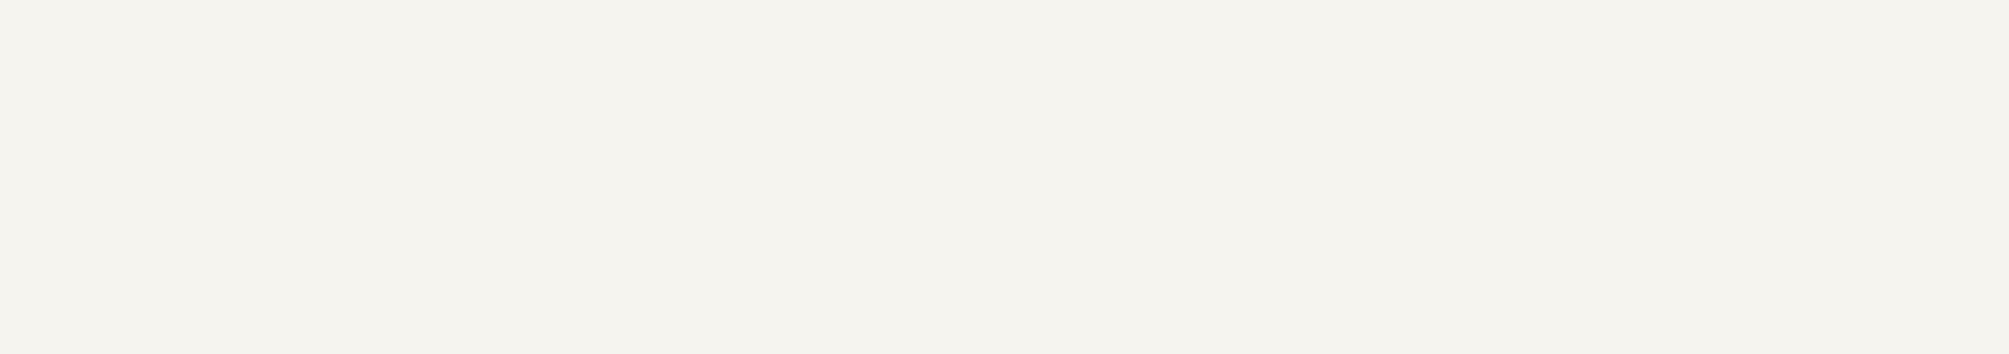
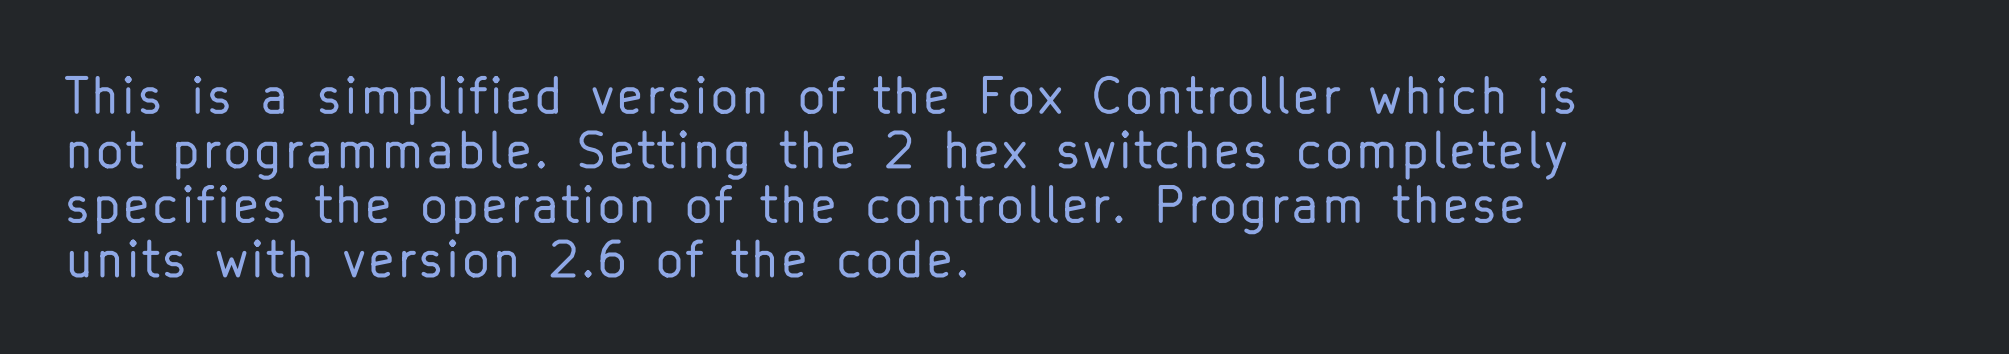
text: none -> This is a simplified version of the Fox Controller which is (819, 100)
text: none -> not programmable. Setting the 2 hex switches completely (817, 155)
text: none -> specifies the operation of the controller. Program these (795, 209)
text: none -> units with version 2.6 of the code. (517, 258)

